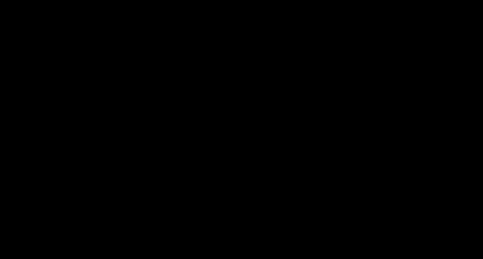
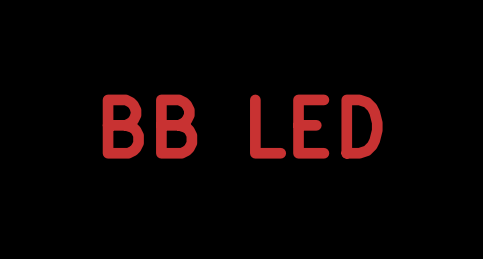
text: none -> BB LED (242, 126)

